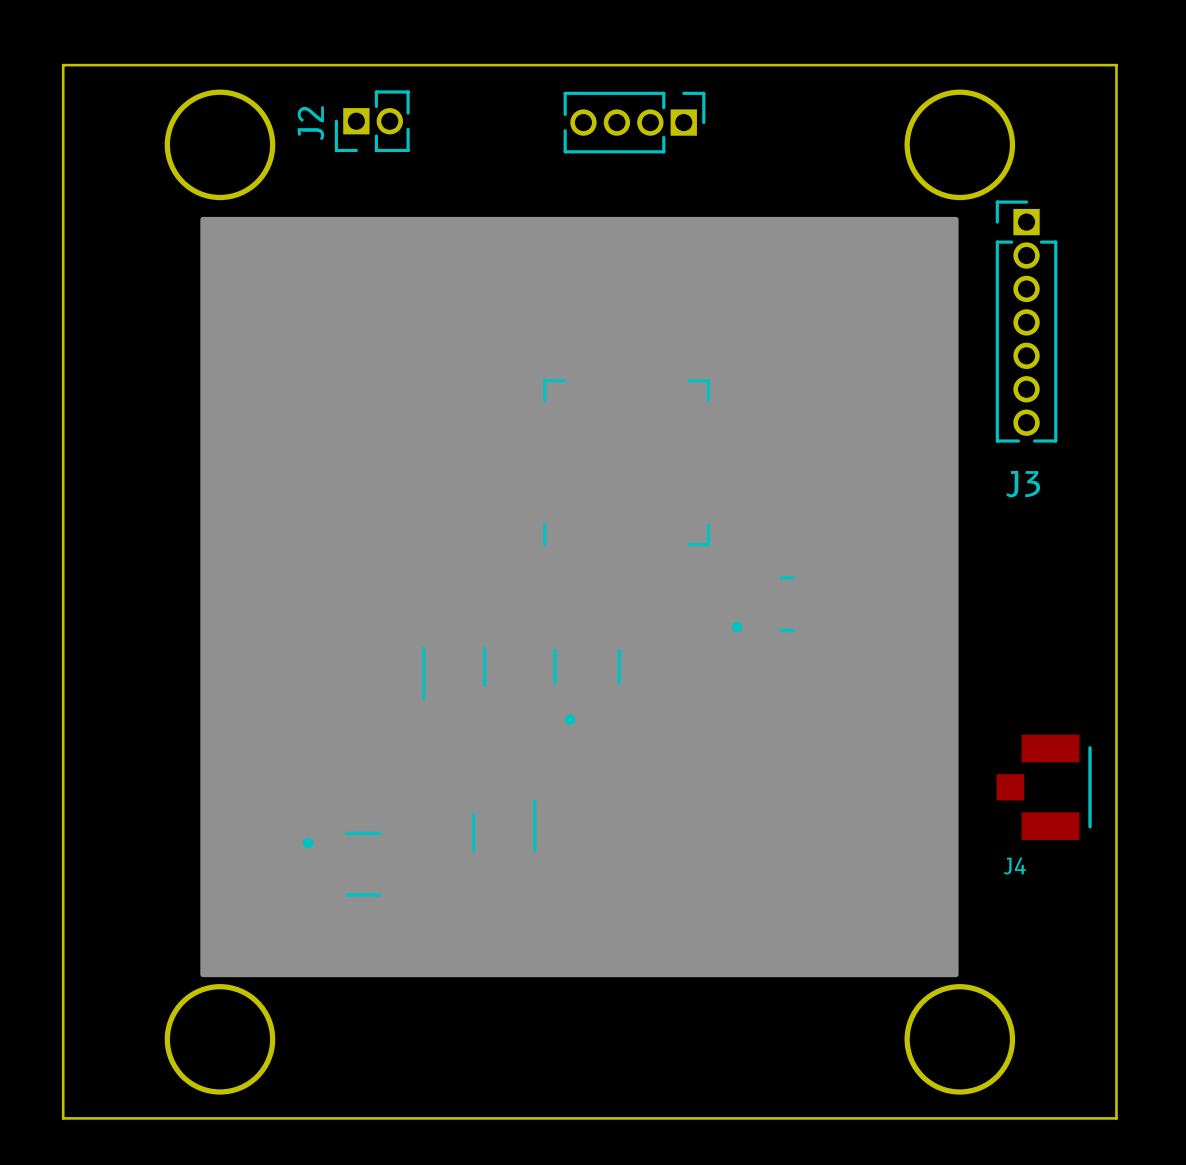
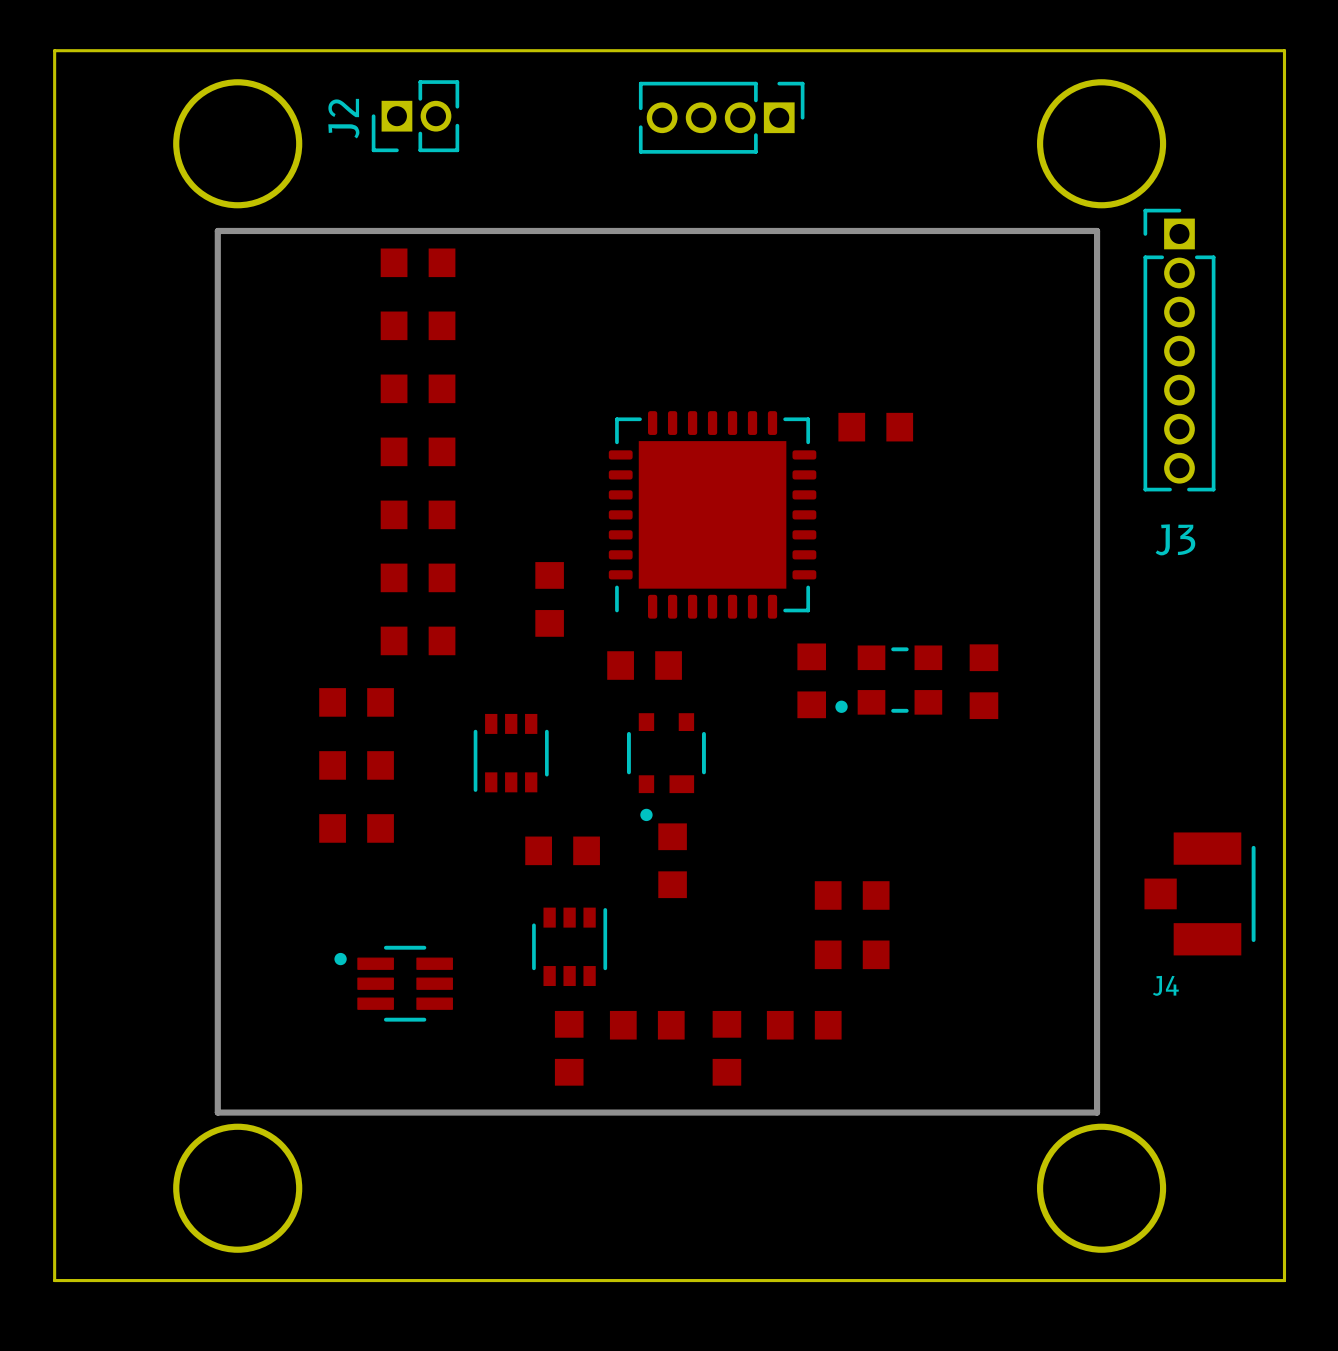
drawing: [200, 216, 959, 978] -> none
line: none -> (217, 230) (1097, 230) (1097, 1112) (217, 1112) (217, 230)

